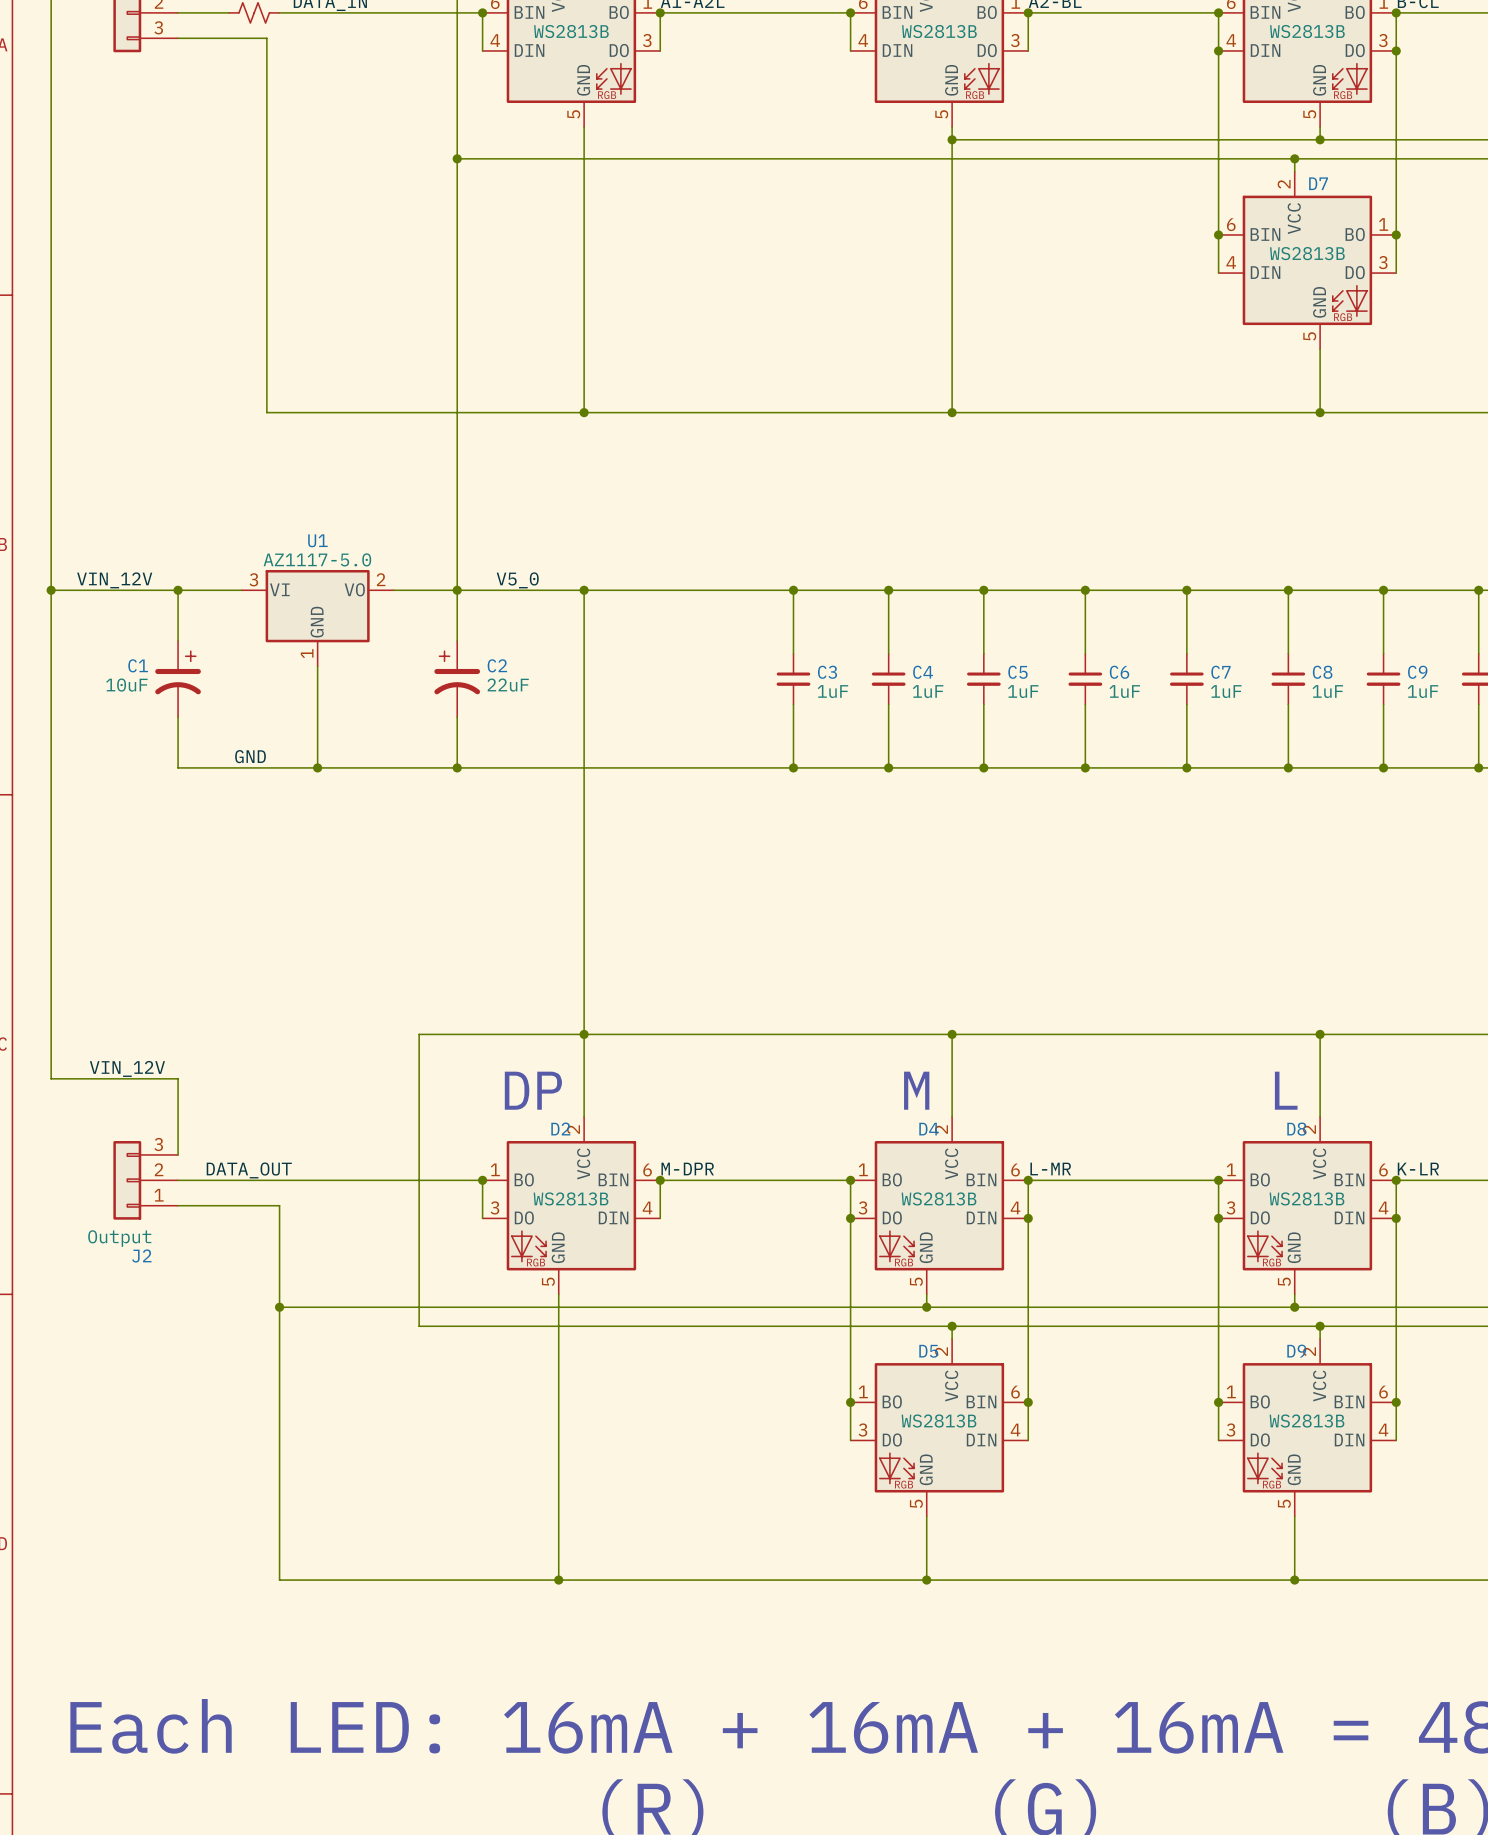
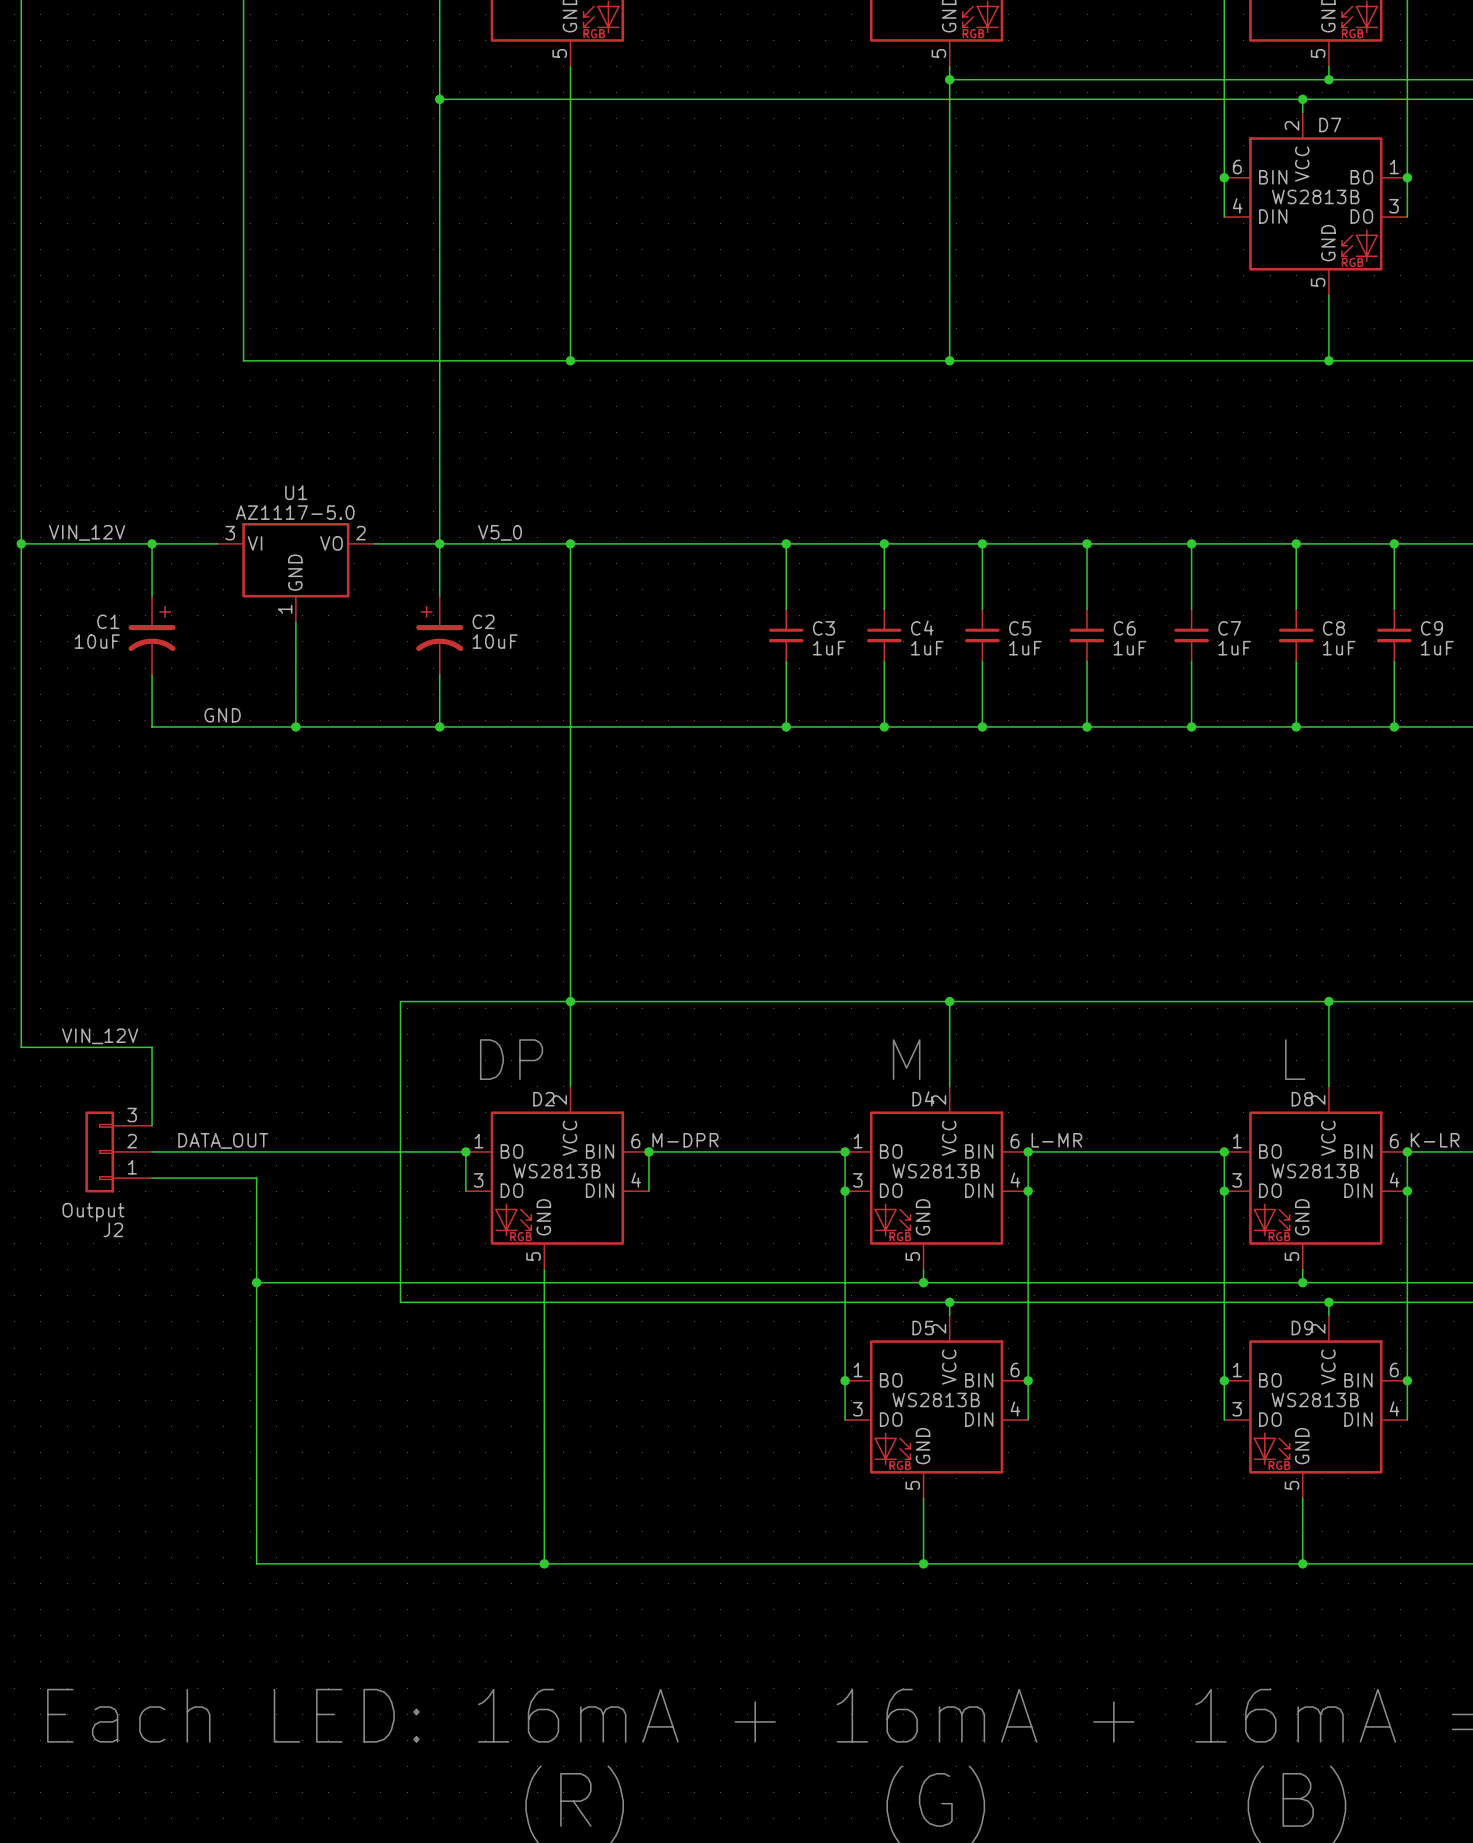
C2 value: 22uF (508, 685) -> 10uF (495, 641)

